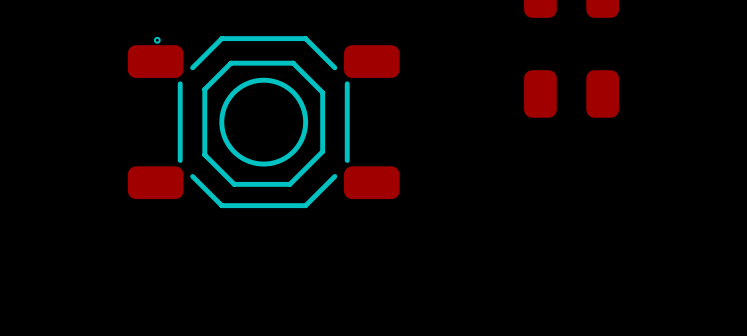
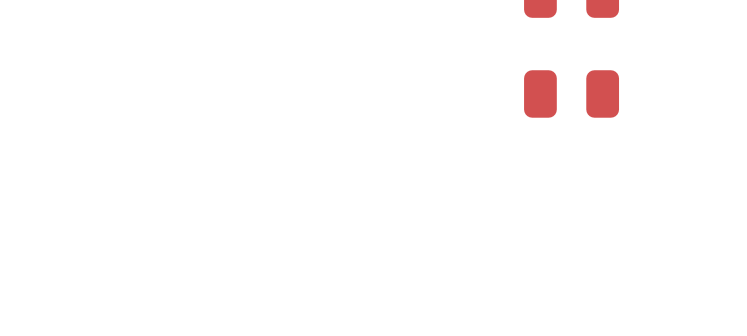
part: (263, 122) -> none

